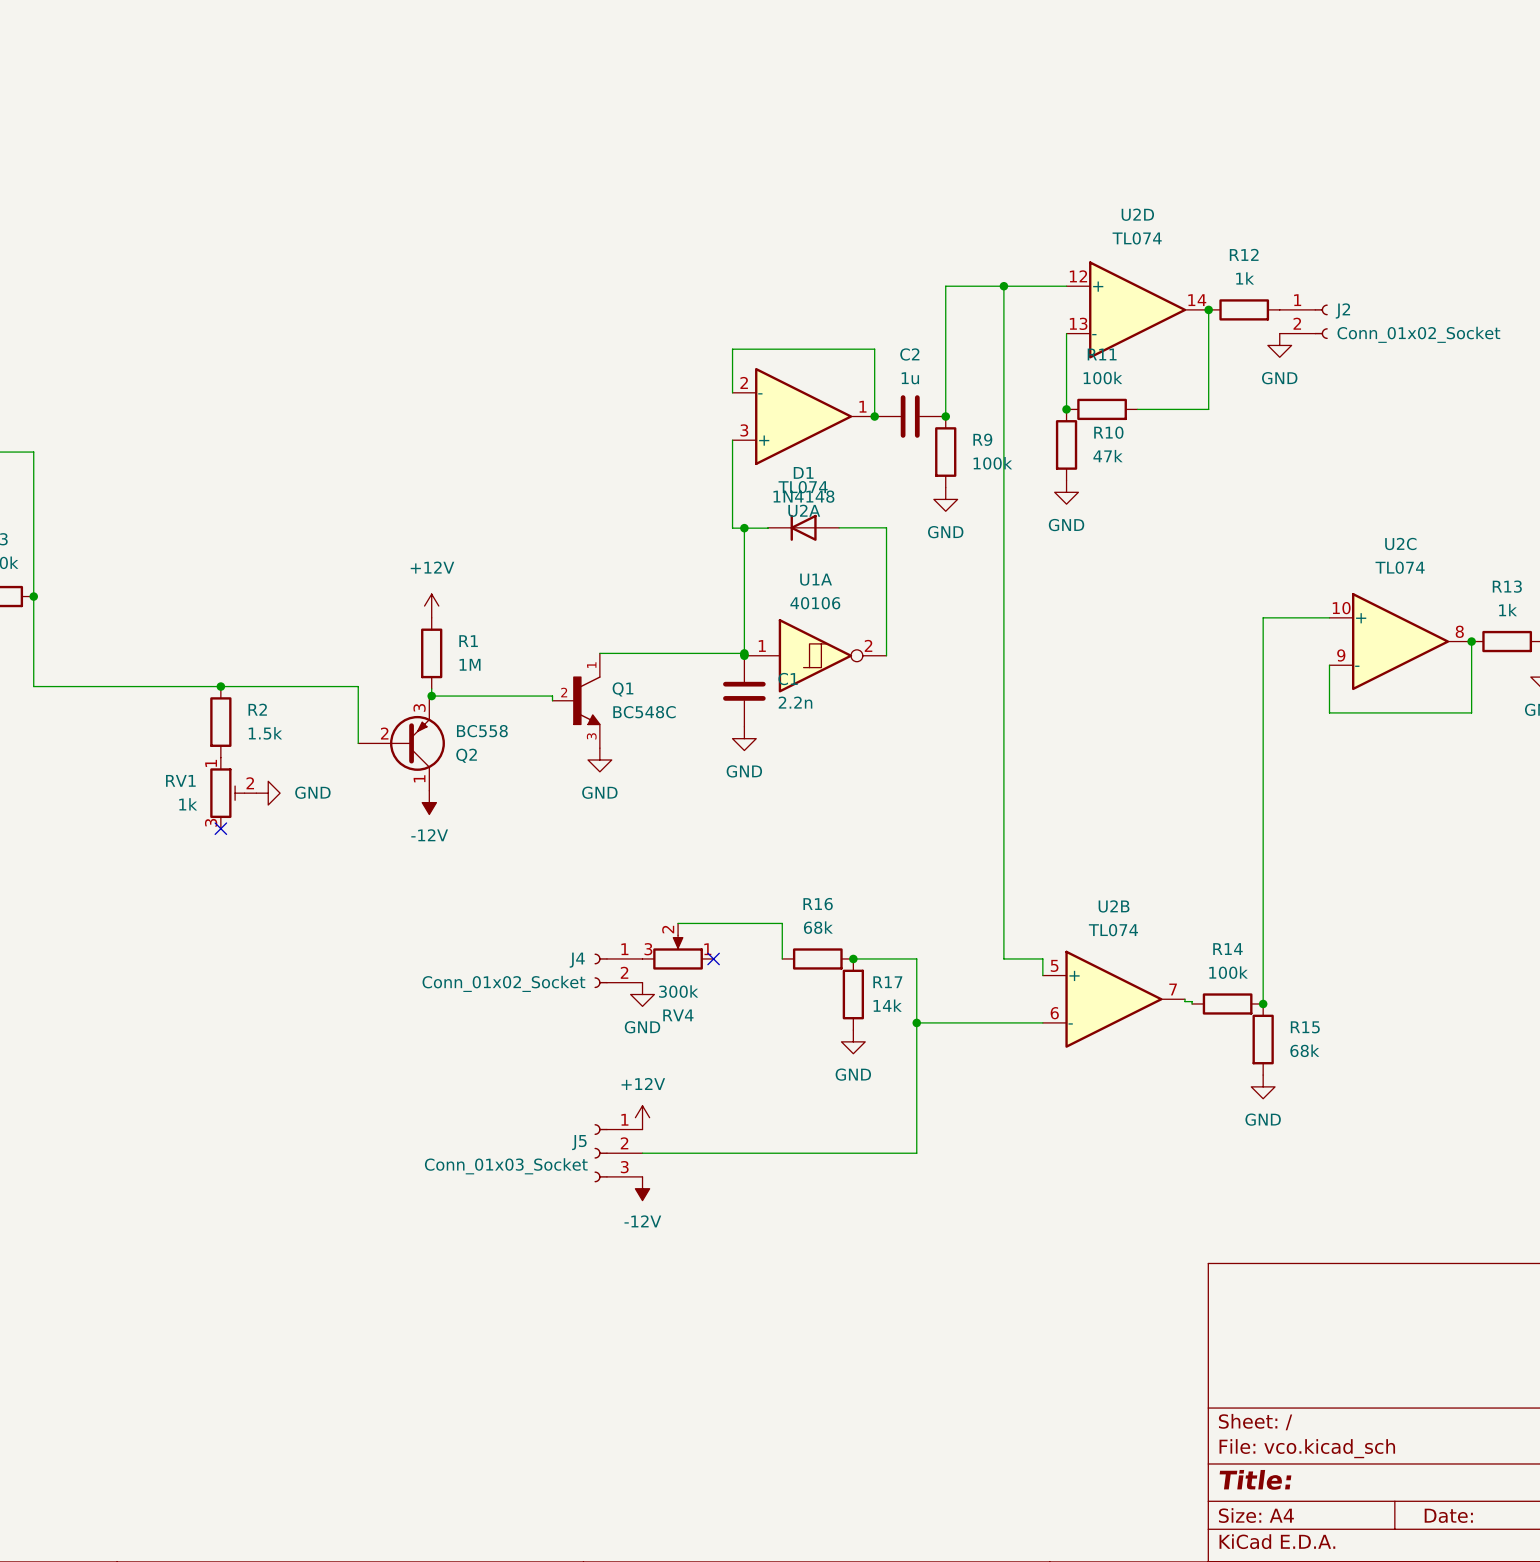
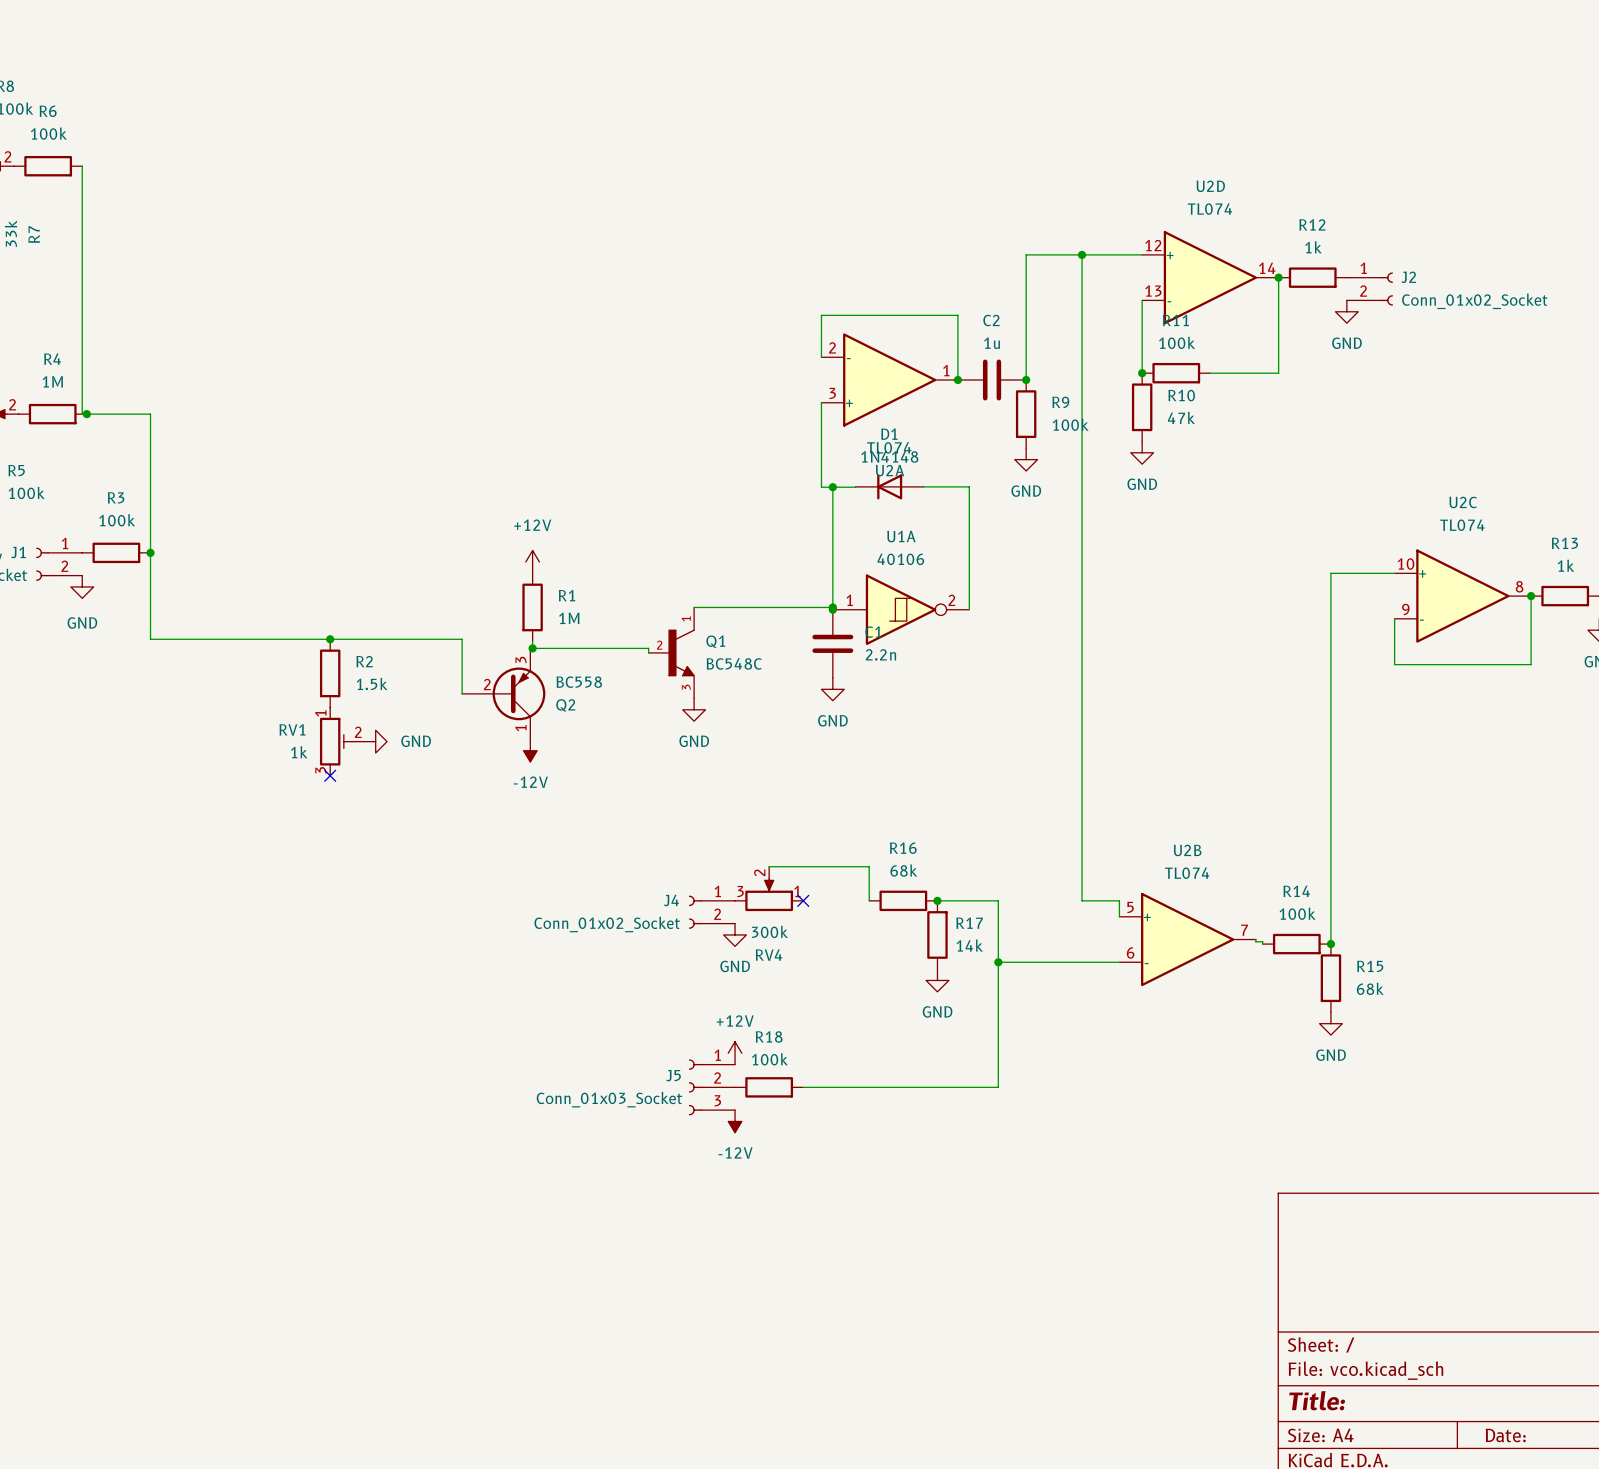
wire: (642, 1153) (713, 1153) -> none
R18: none -> 100k (769, 1087)

